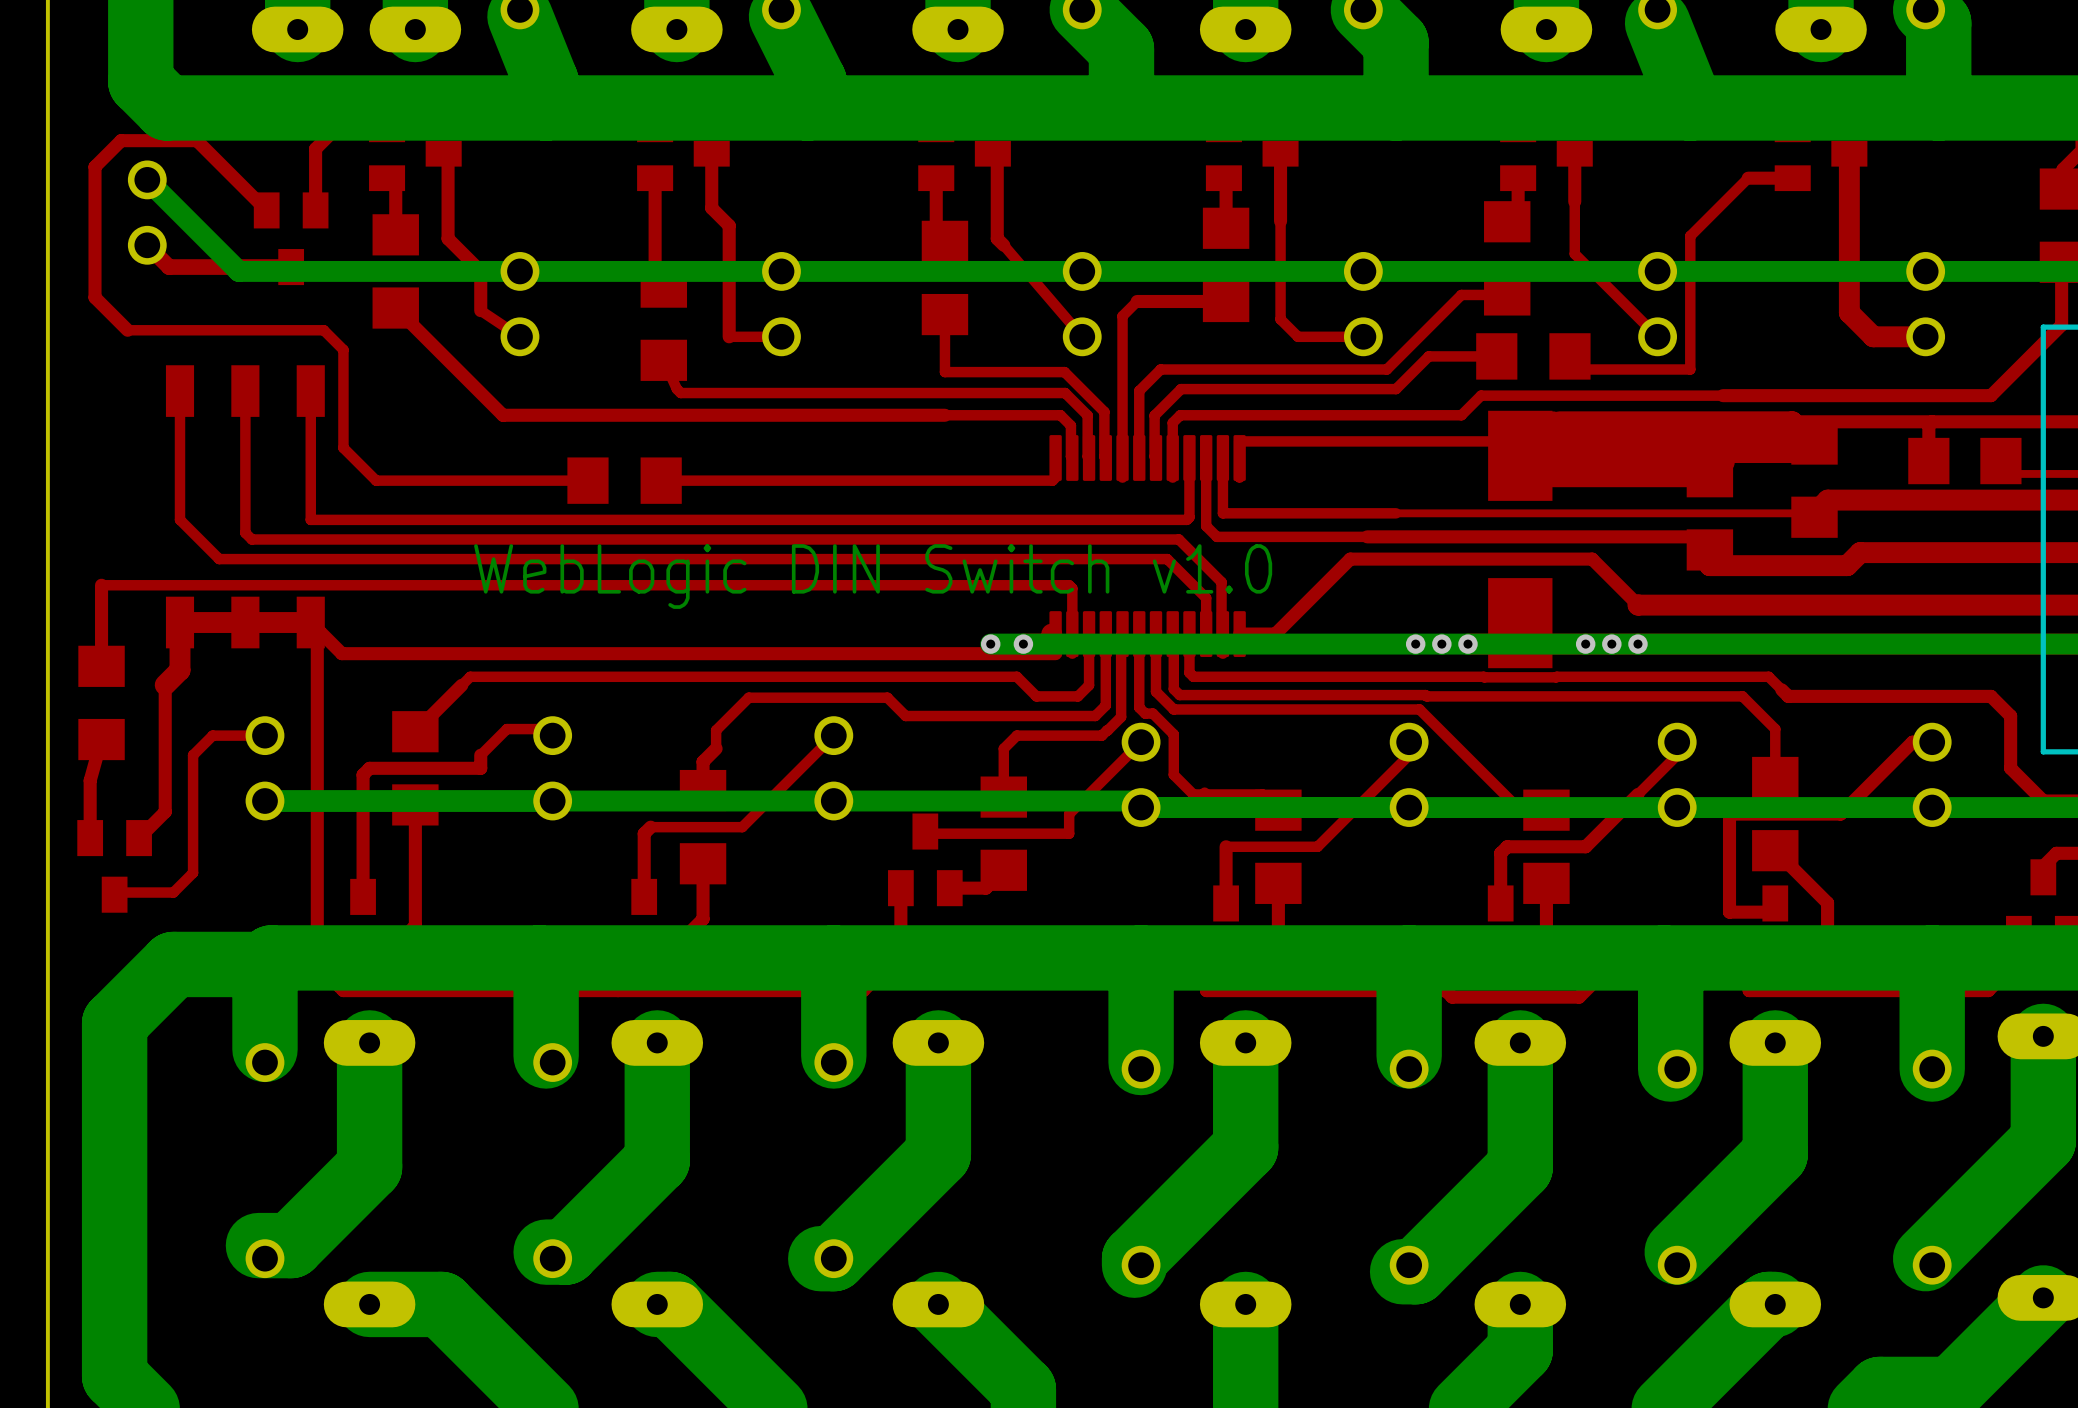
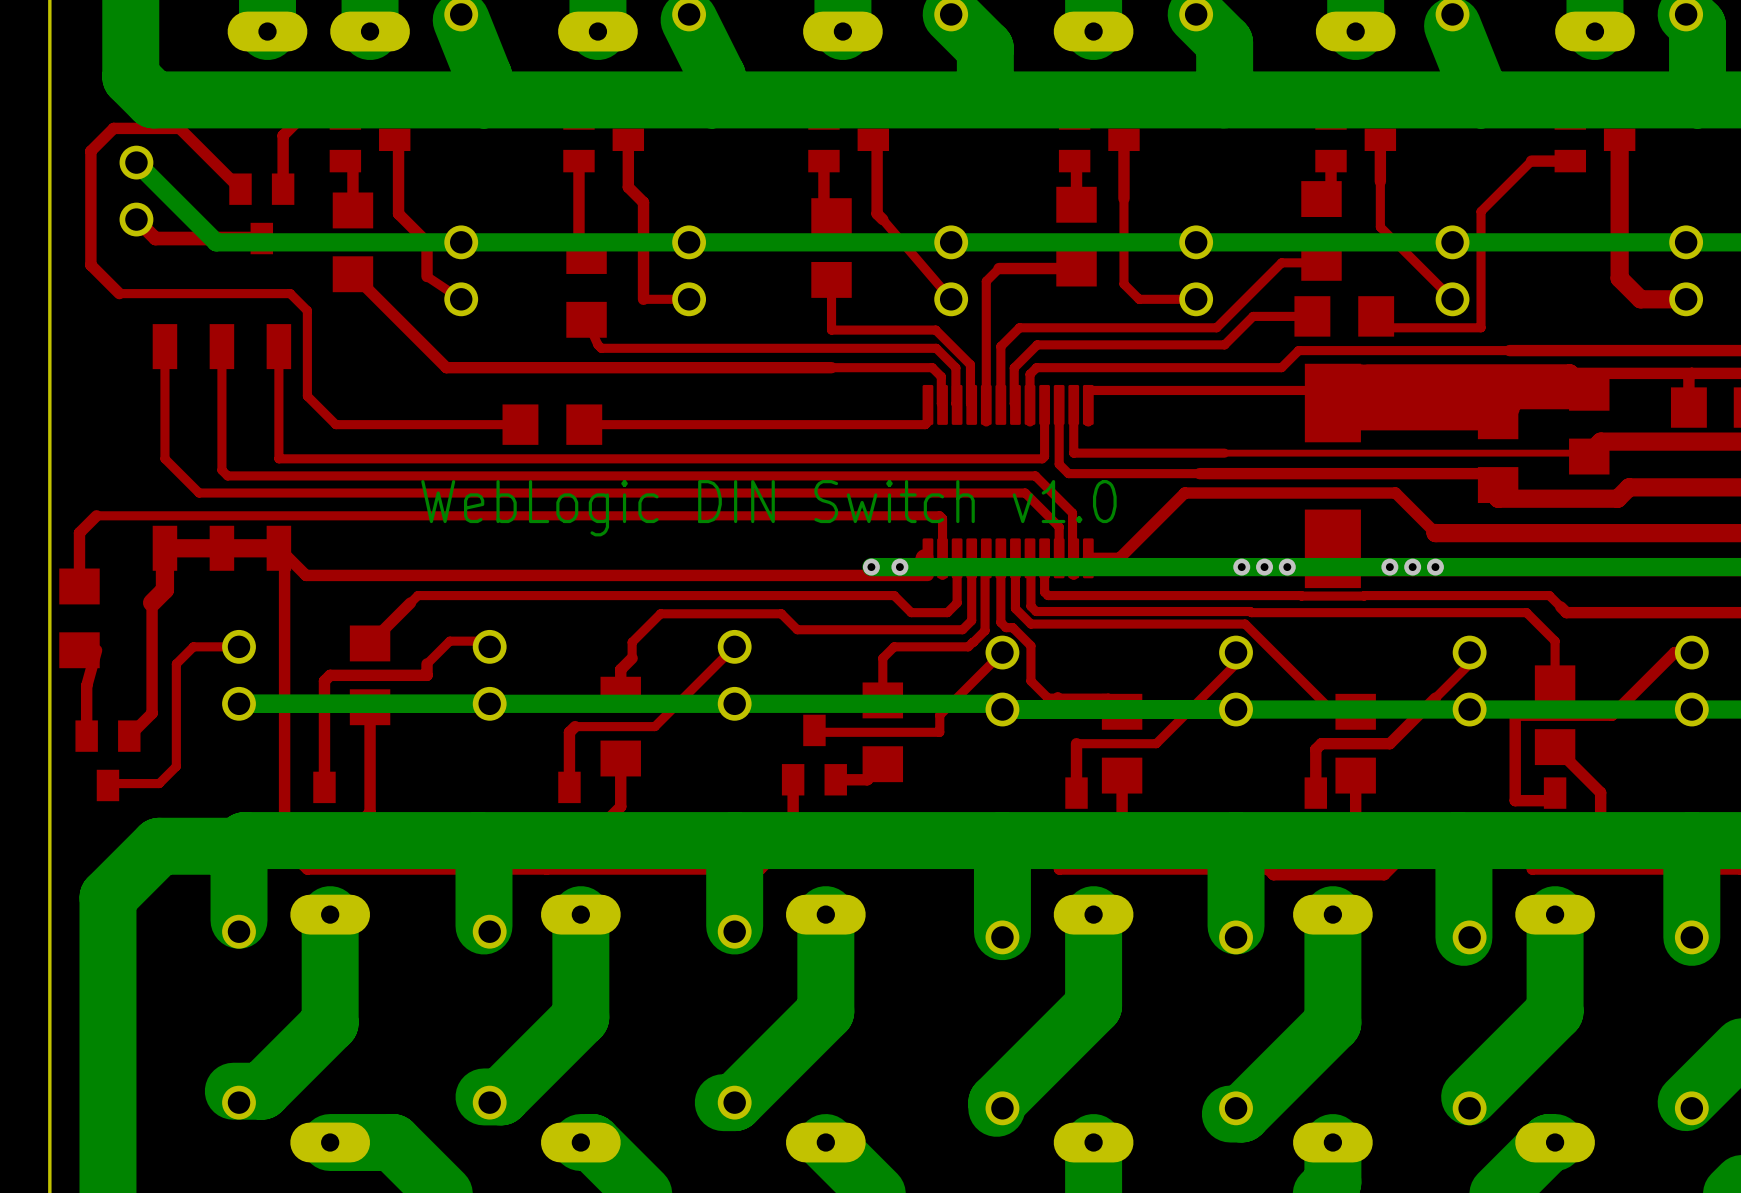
top track: (101, 585) (101, 666) -> (96, 515) (79, 532) (79, 586)
part position: (101, 702) -> (79, 618)

